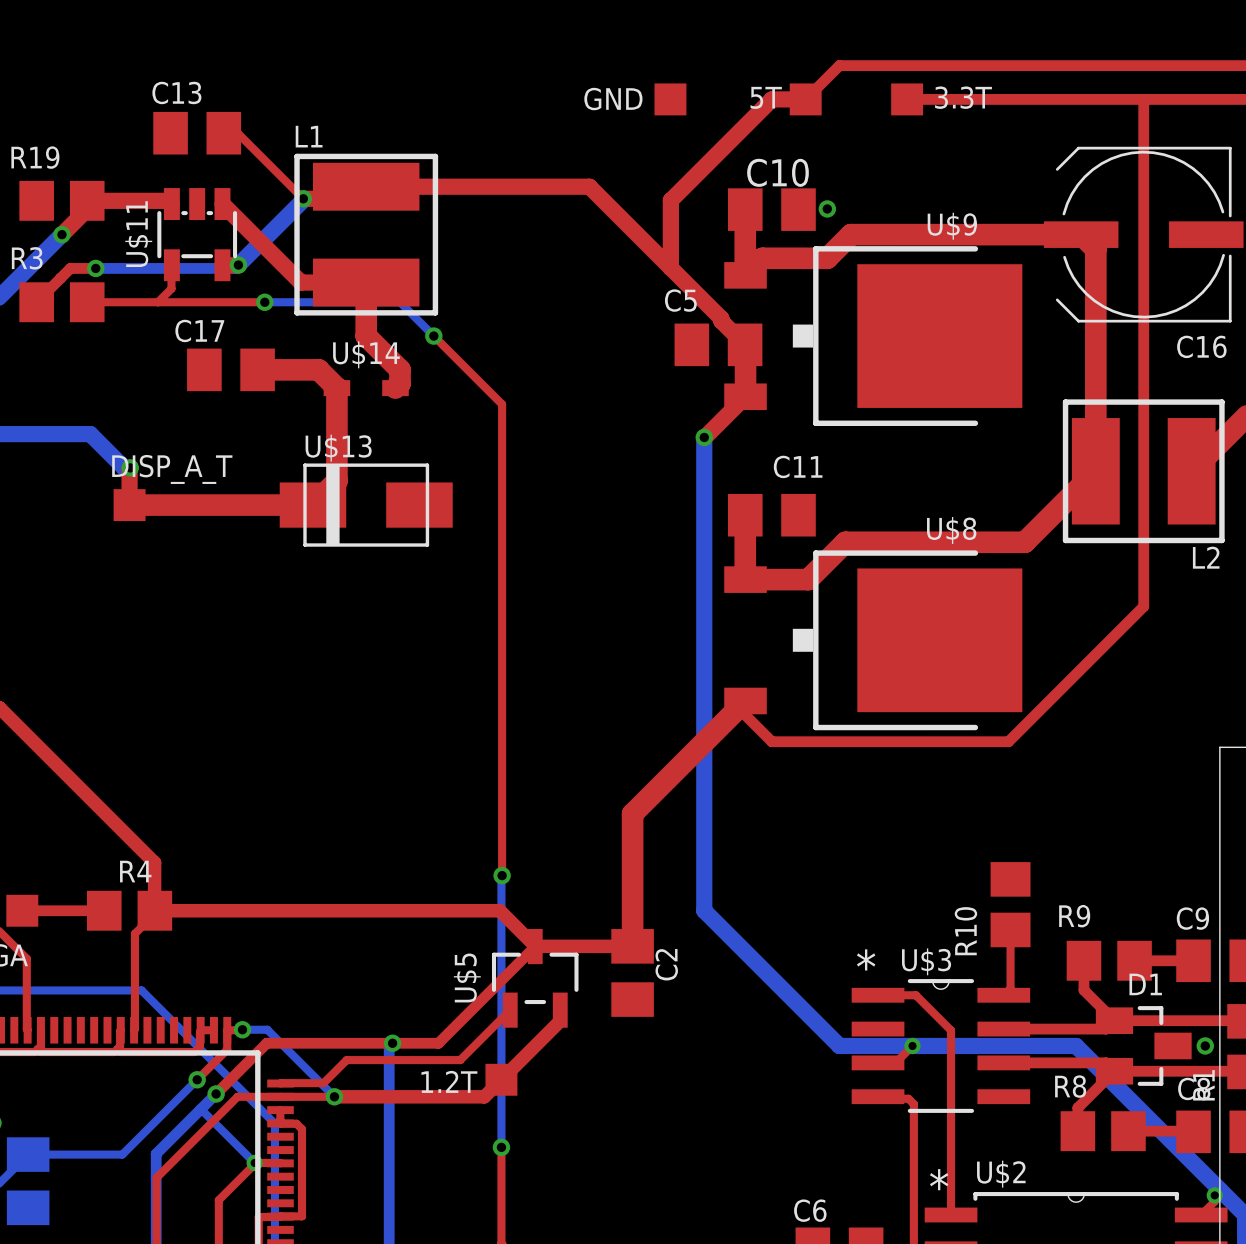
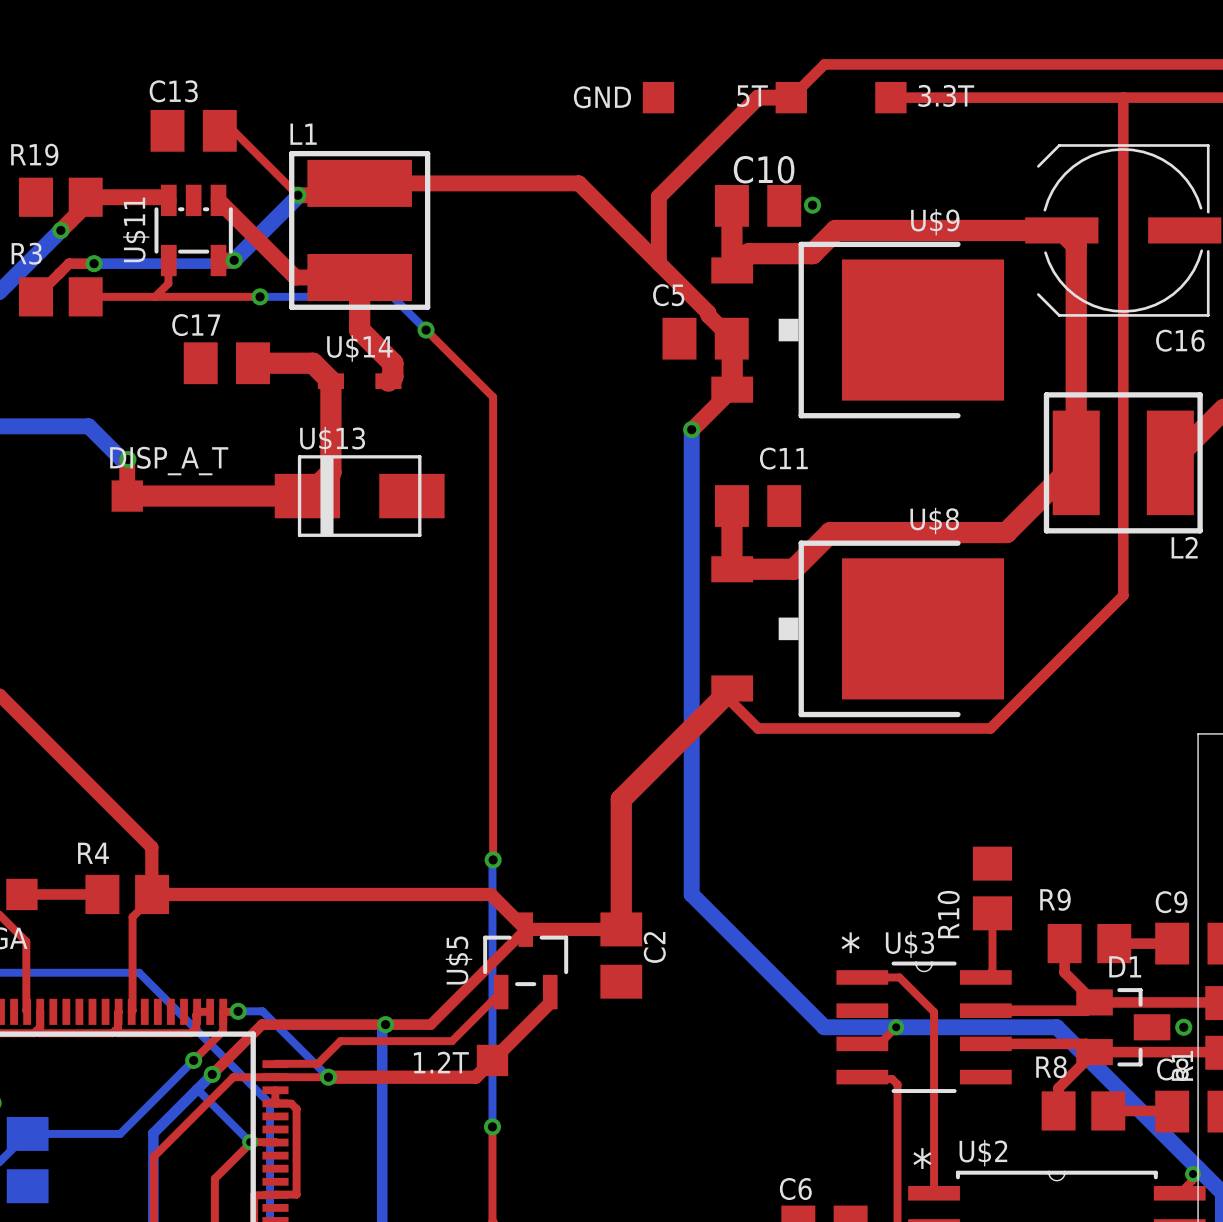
R4 name position: R4 (135, 871) -> R4 (93, 853)

